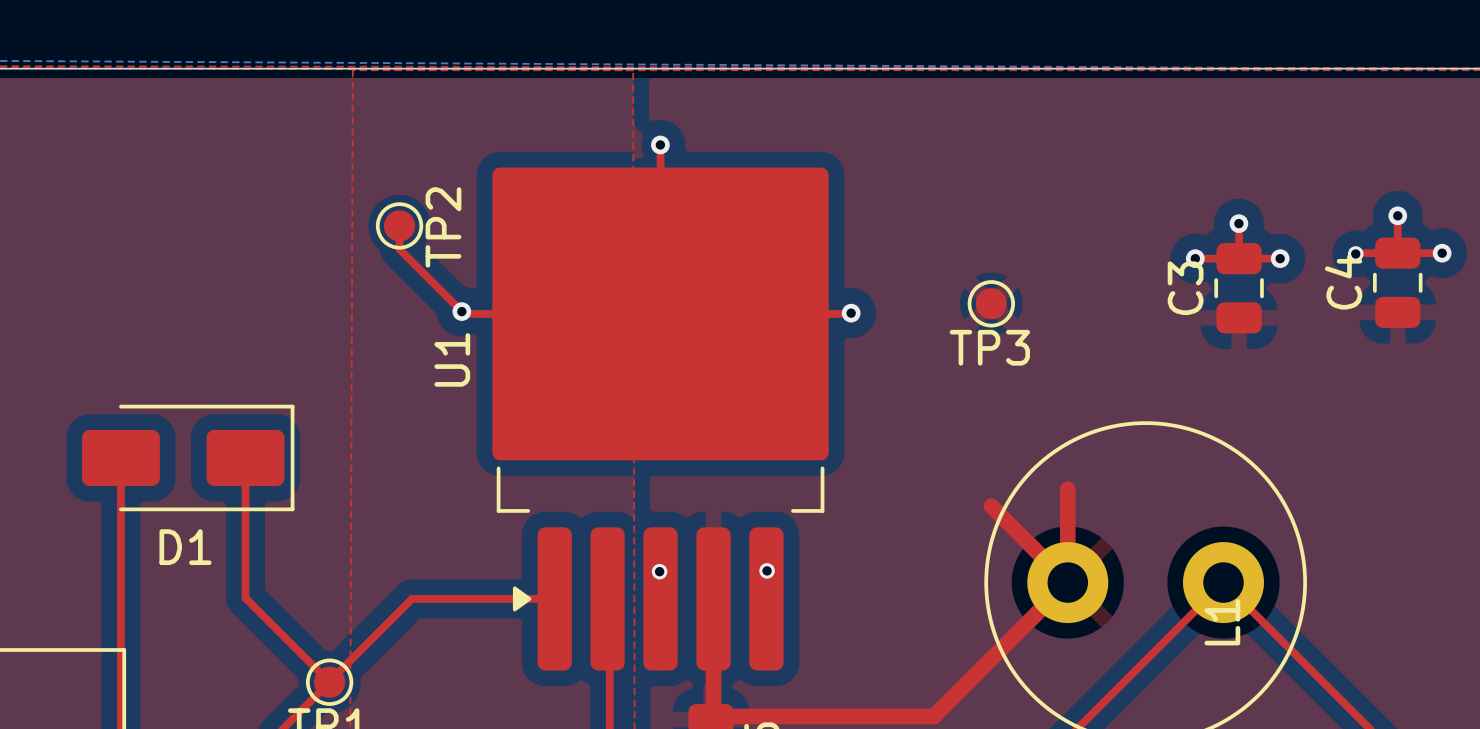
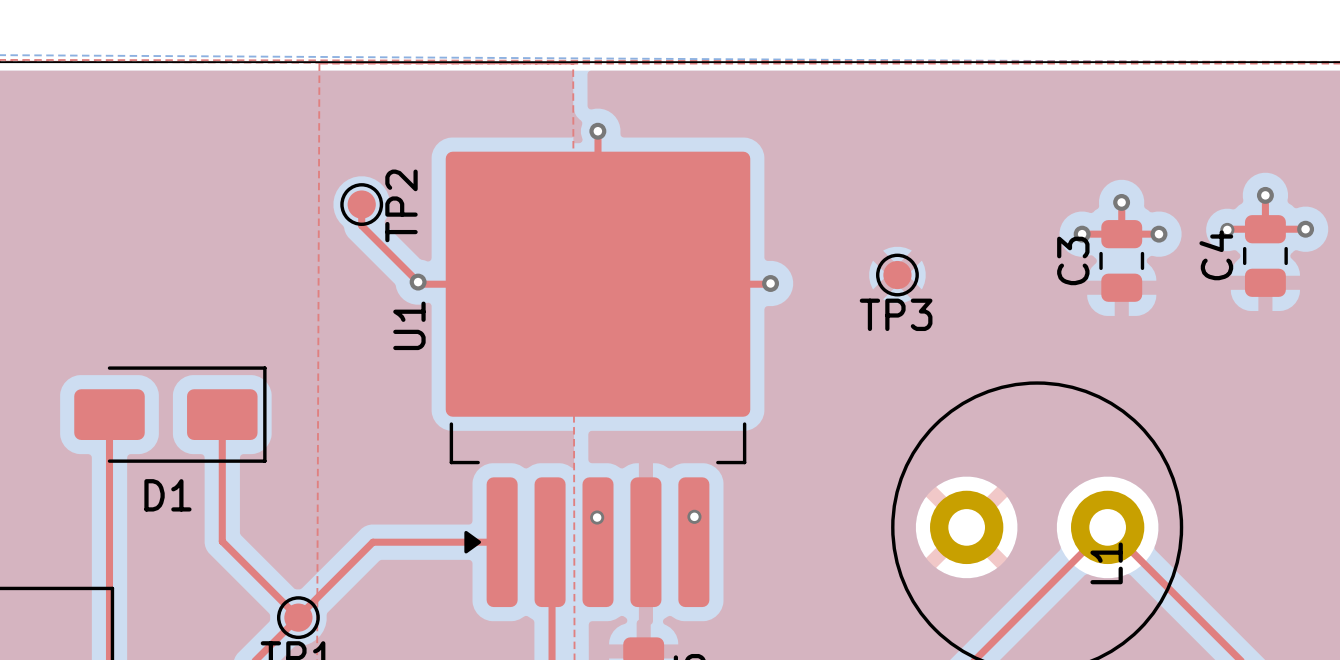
top track: (1067, 489) (1067, 582) -> none
top track: (991, 506) (1067, 582) -> none
top track: (1067, 582) (933, 716) (711, 716) (713, 714) (713, 598) -> none

